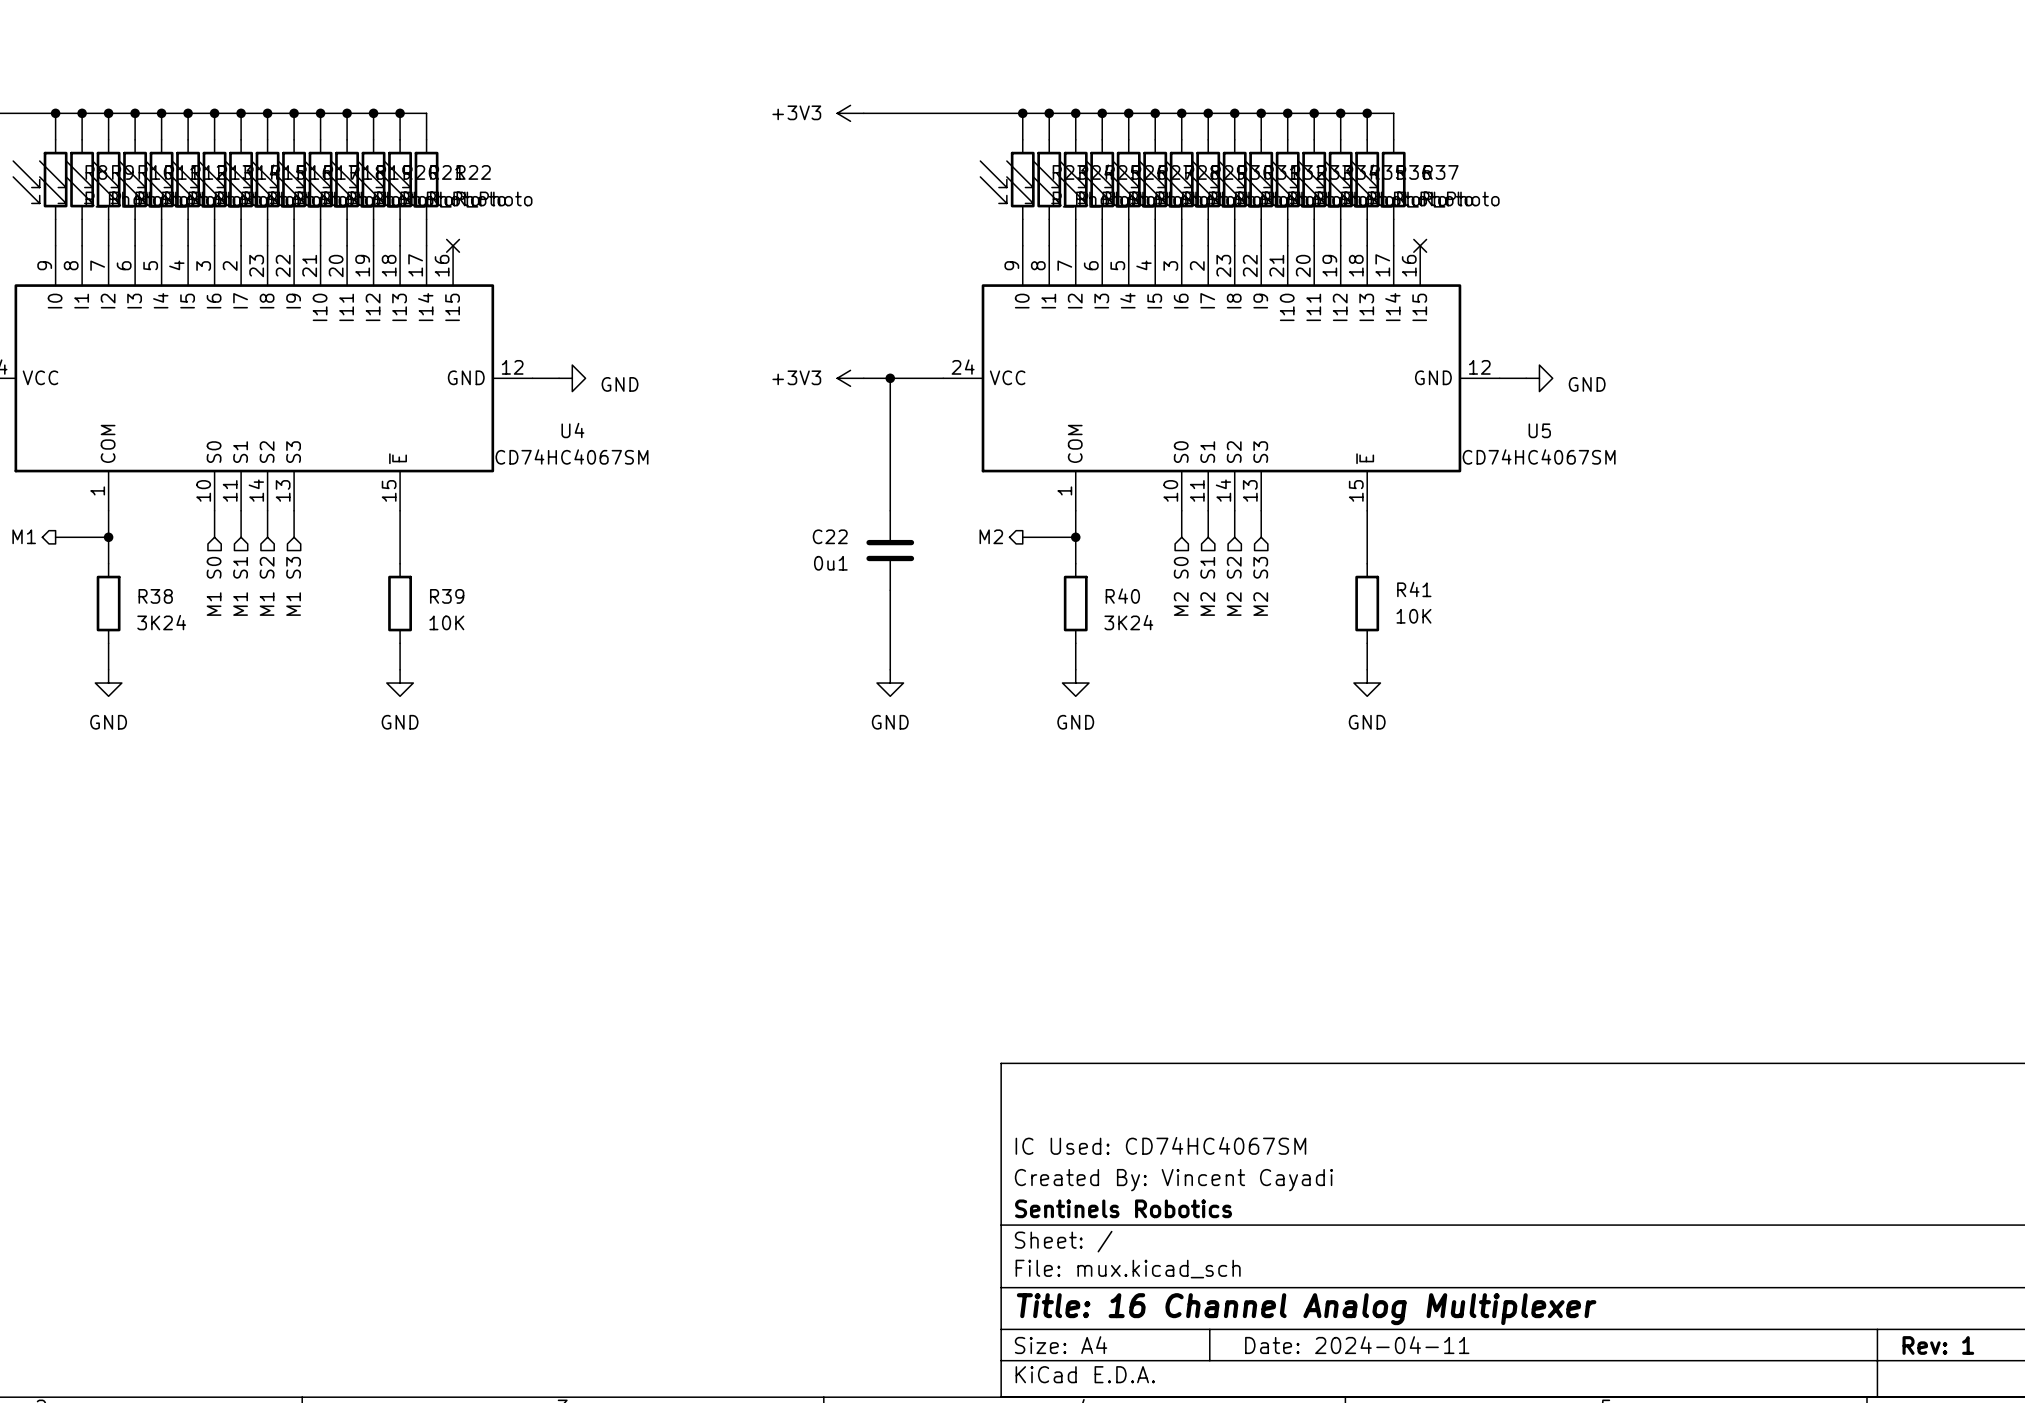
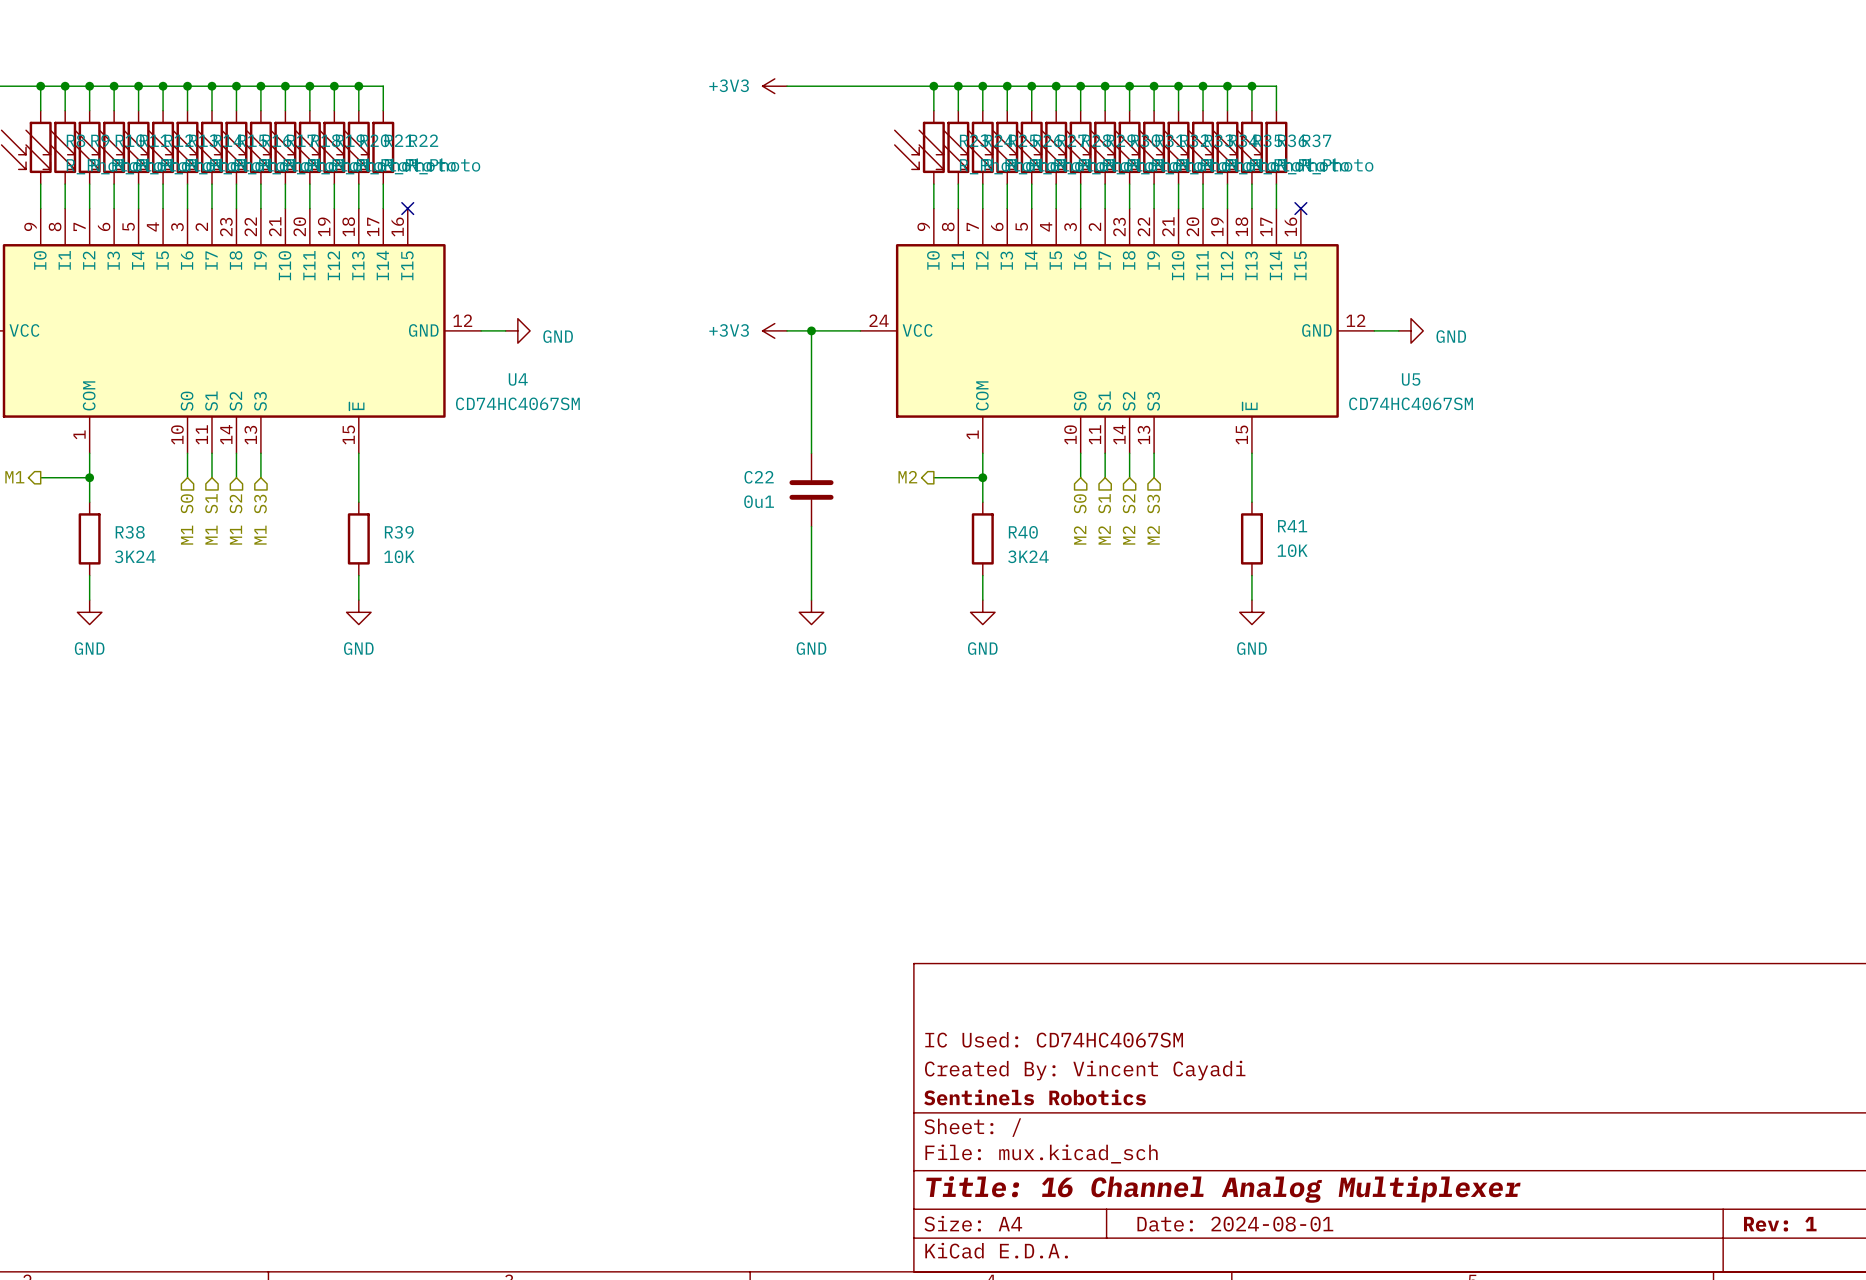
title block: Date: 2024-04-11 (1357, 1345) -> Date: 2024-08-01 (1235, 1224)

